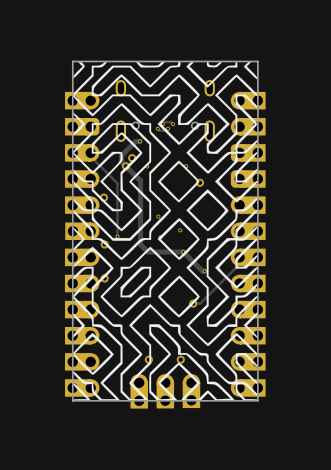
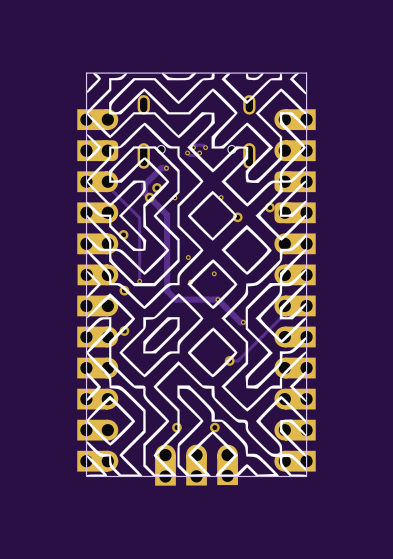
via: none -> (269, 207)

